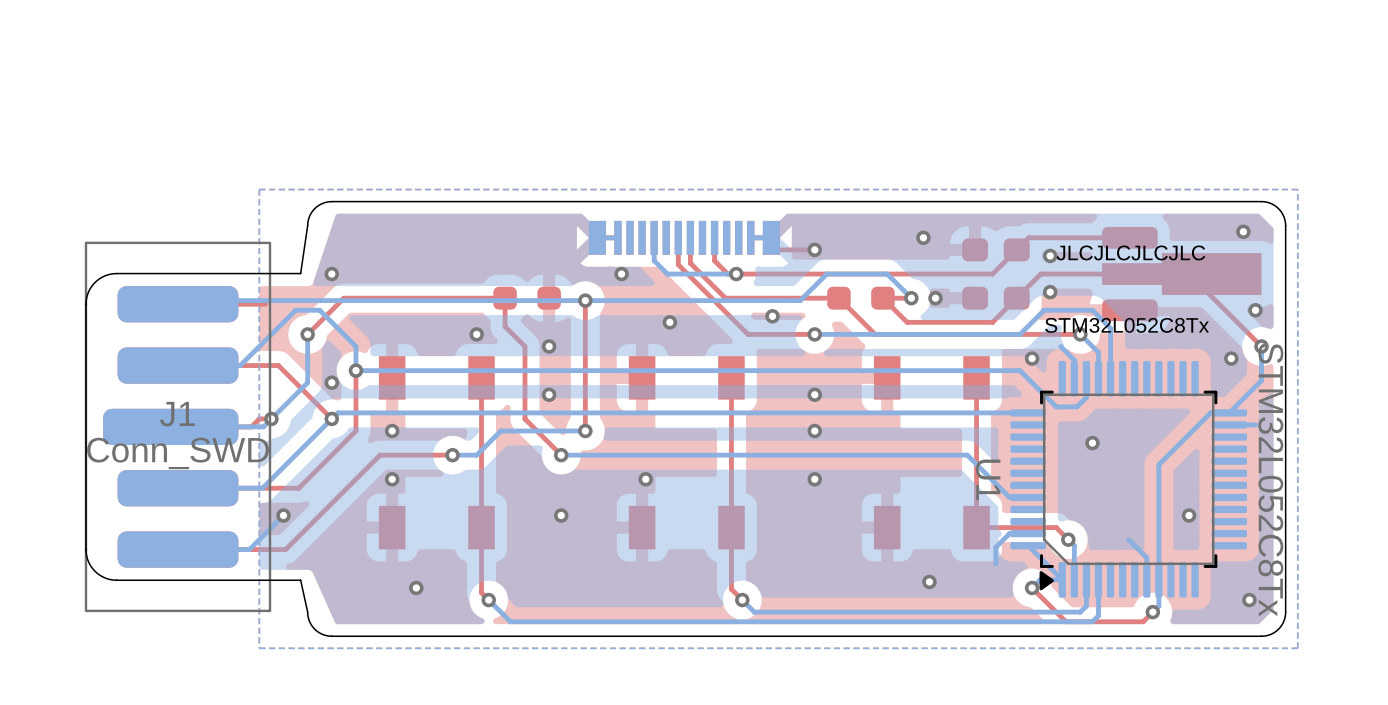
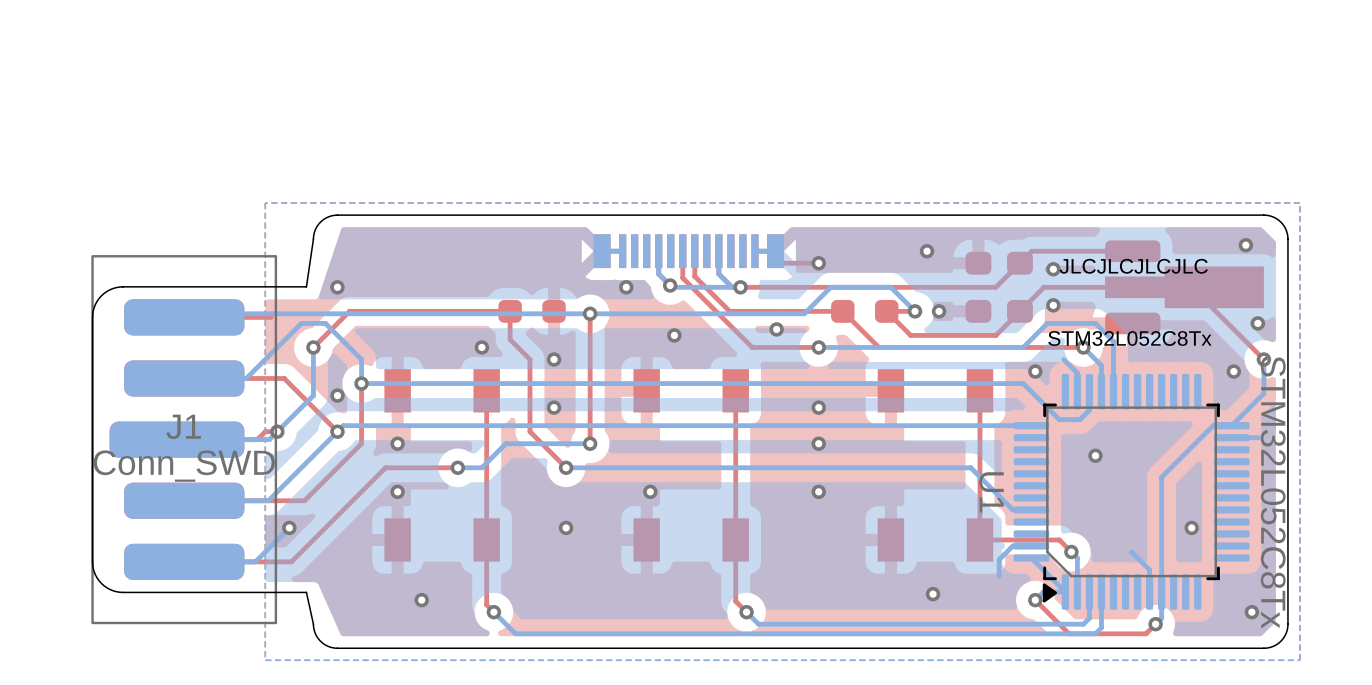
bottom track: none -> (718, 251) (718, 274) (732, 287)
via: none -> (670, 285)

